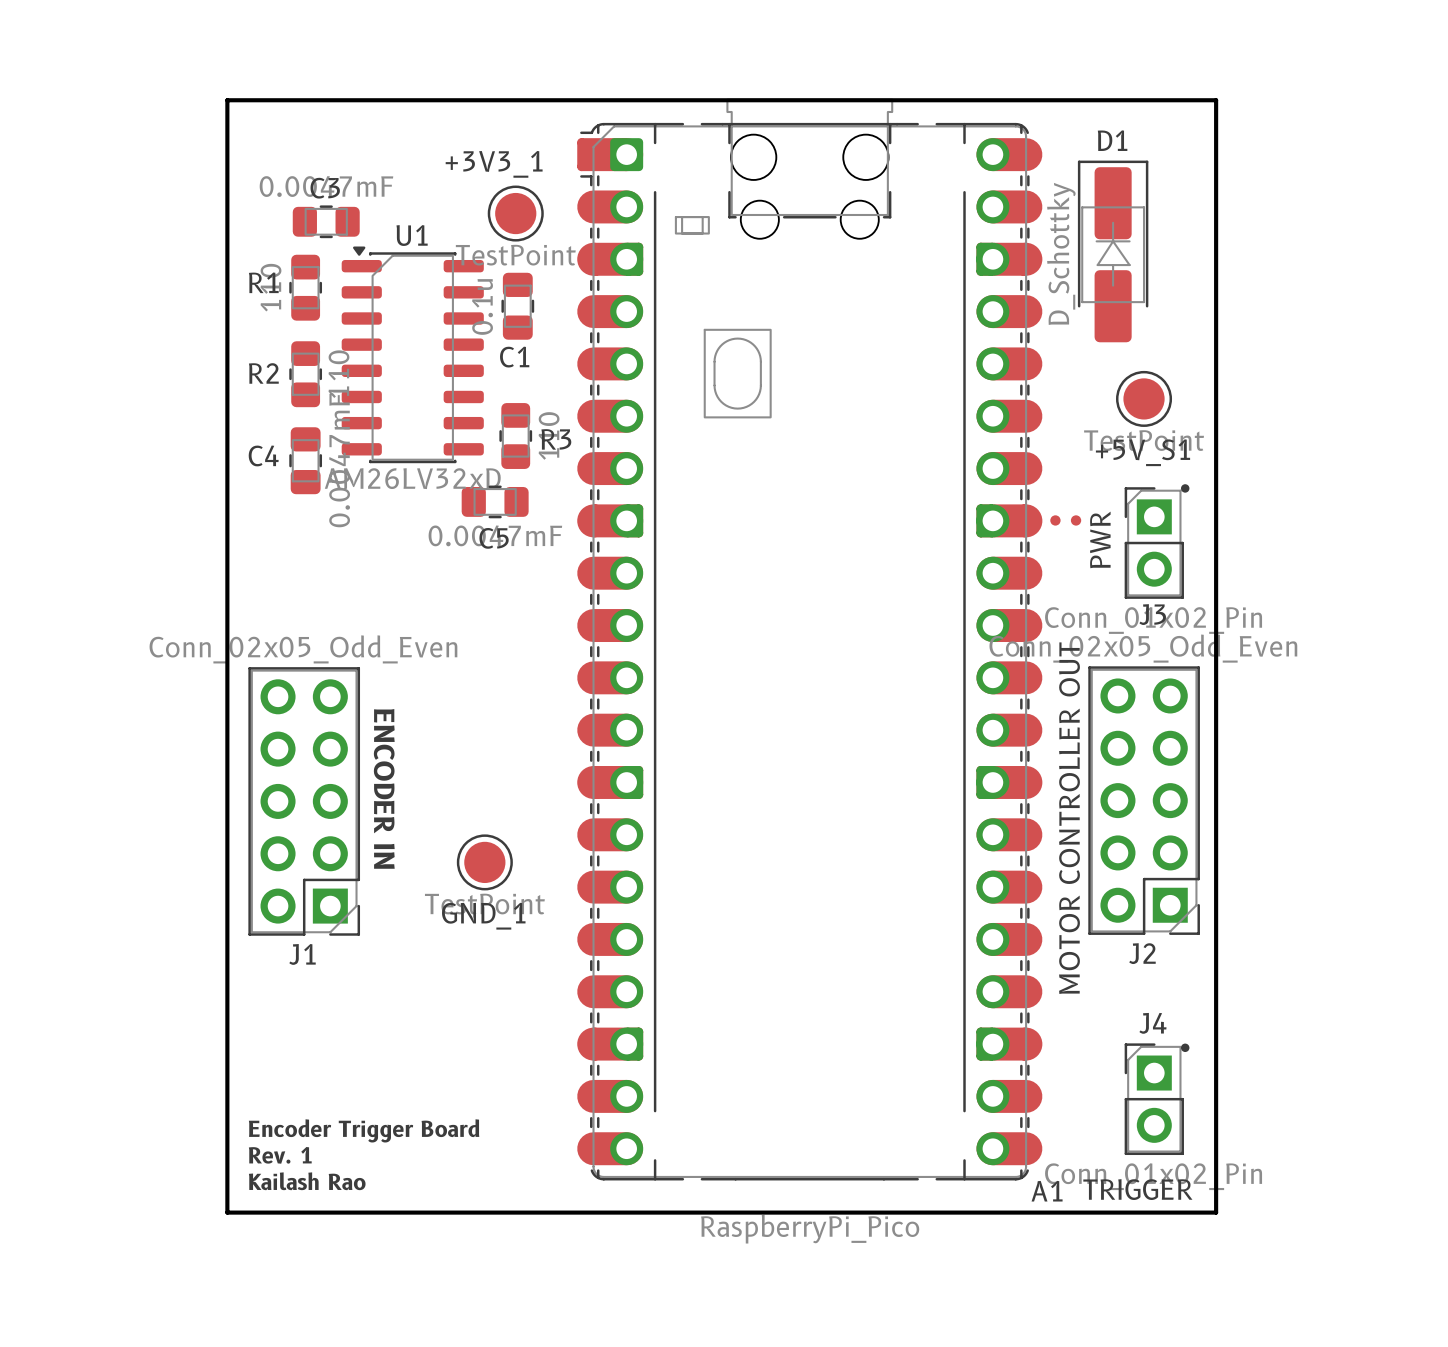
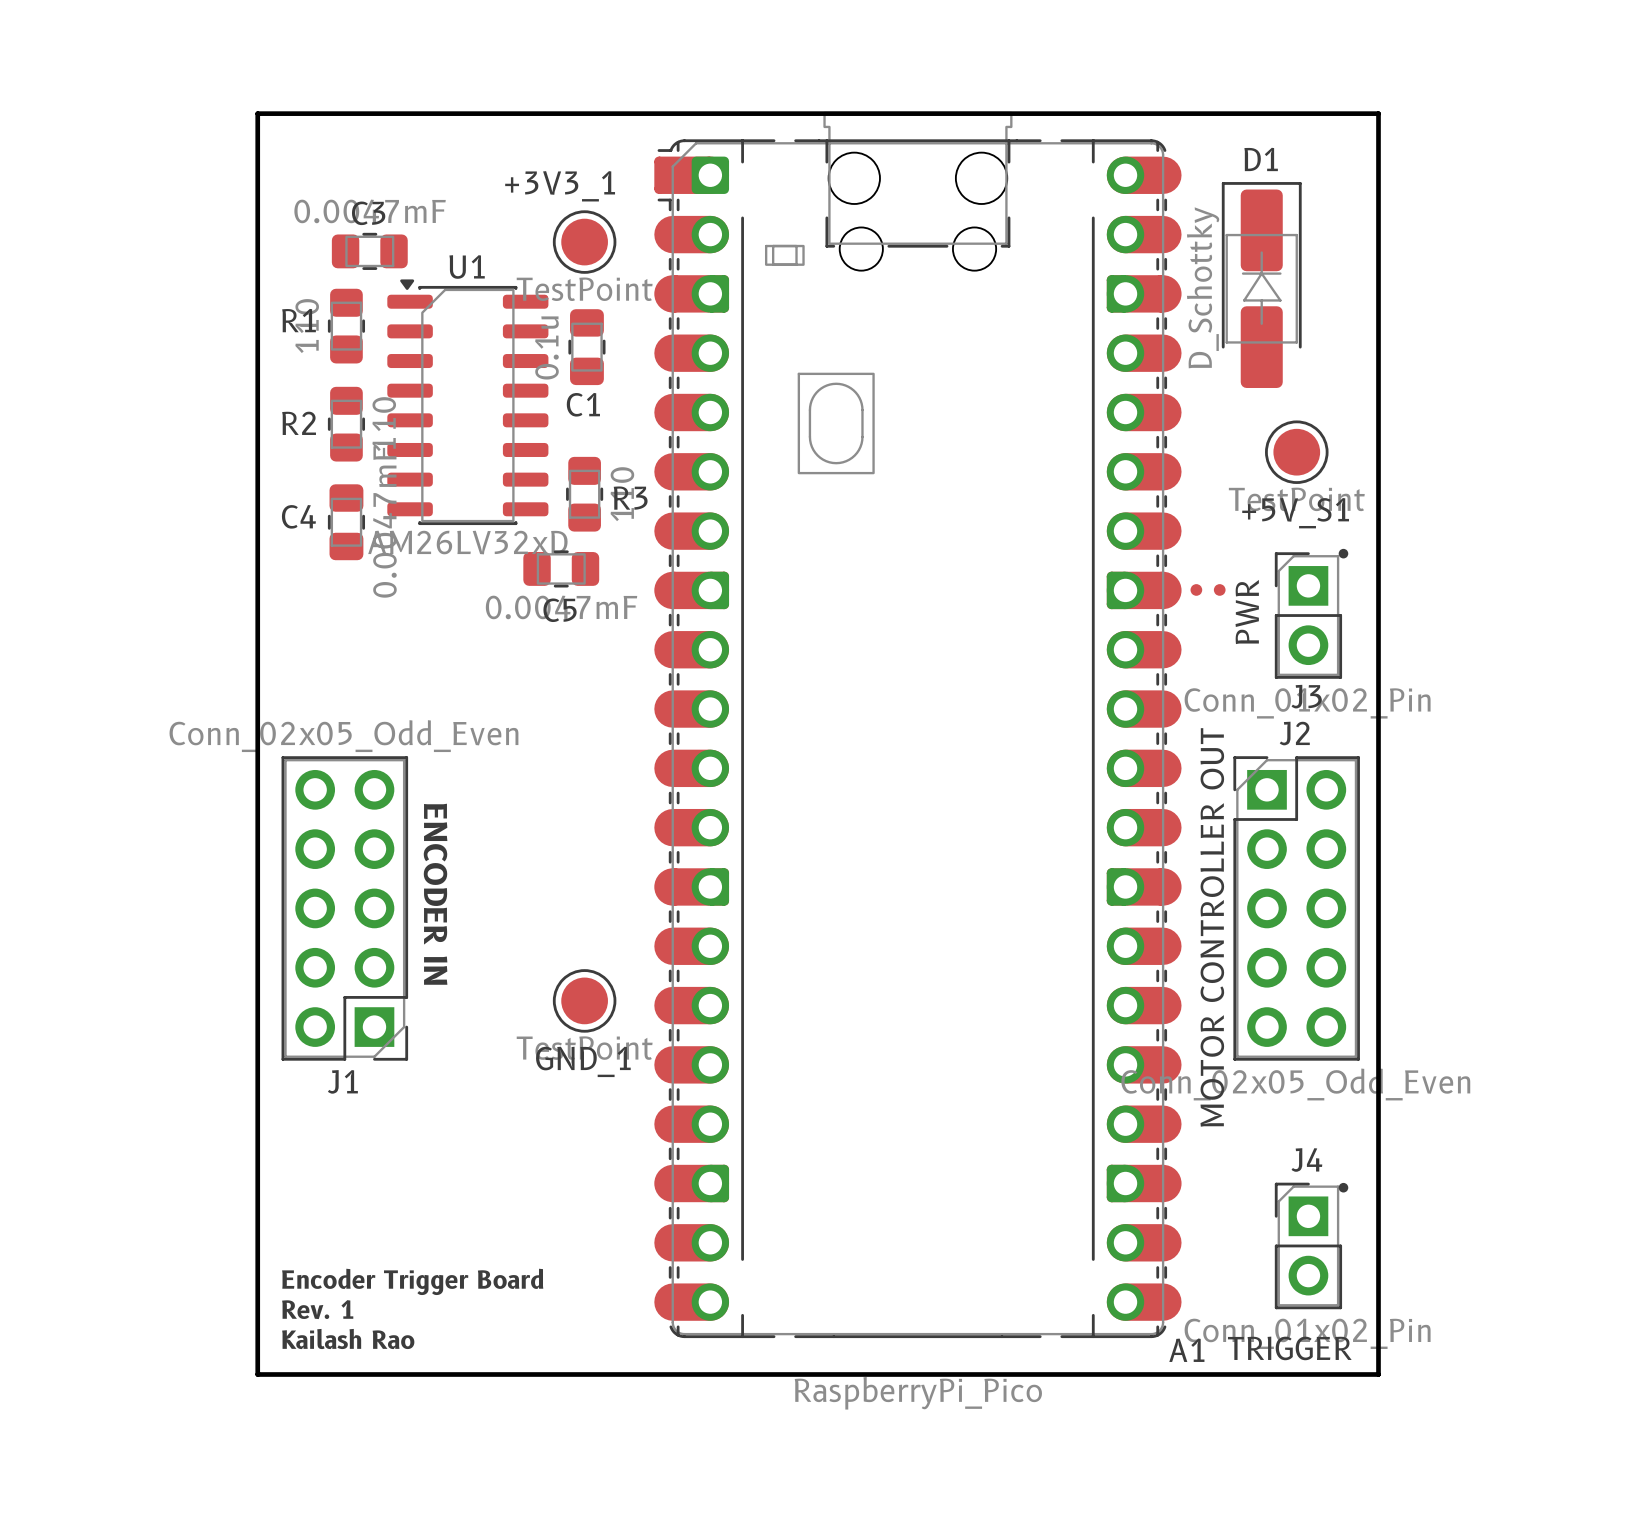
J2 rotation: 0° (1144, 800) -> 180° (1296, 908)
GND_1 position: (484, 862) -> (584, 1000)

